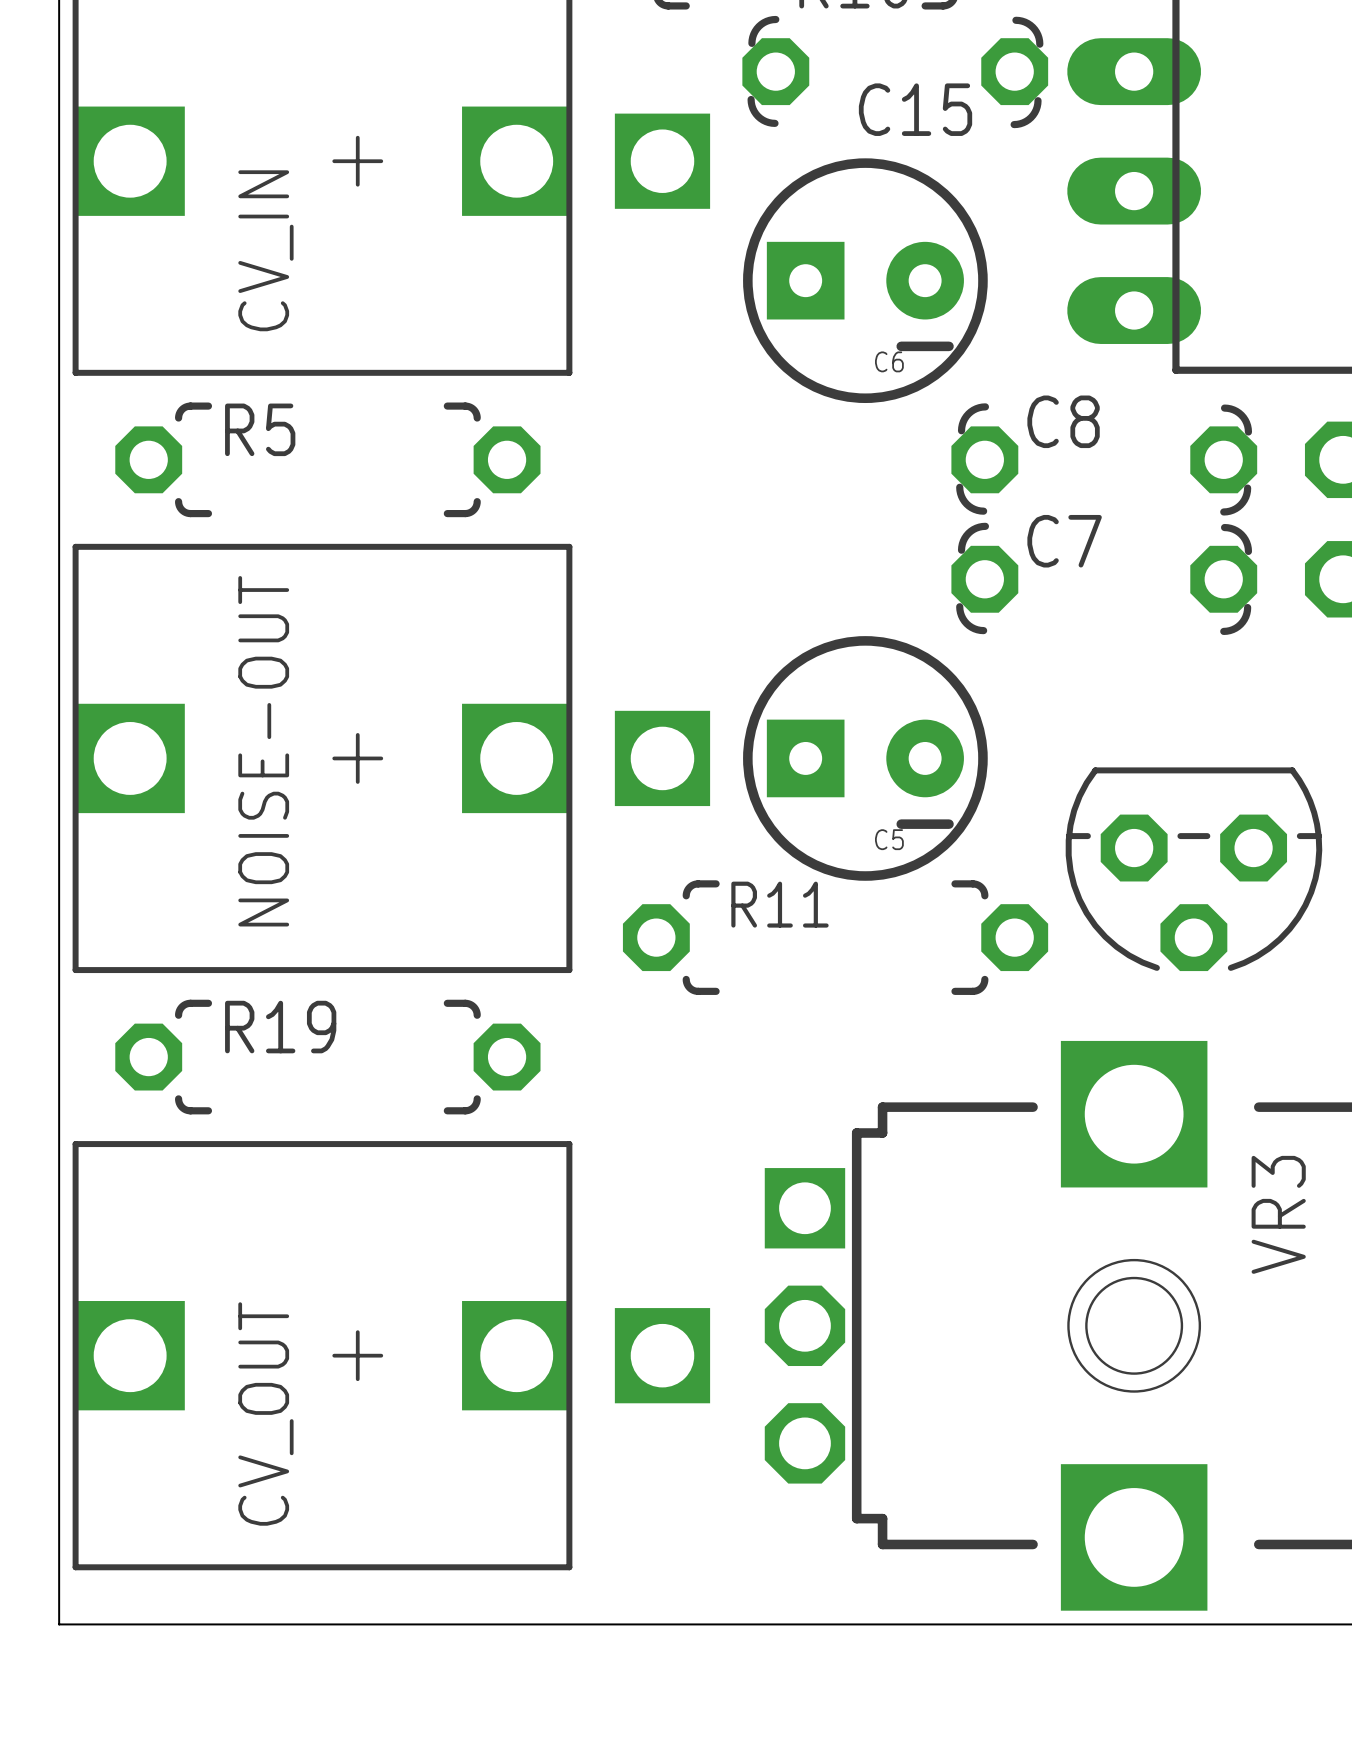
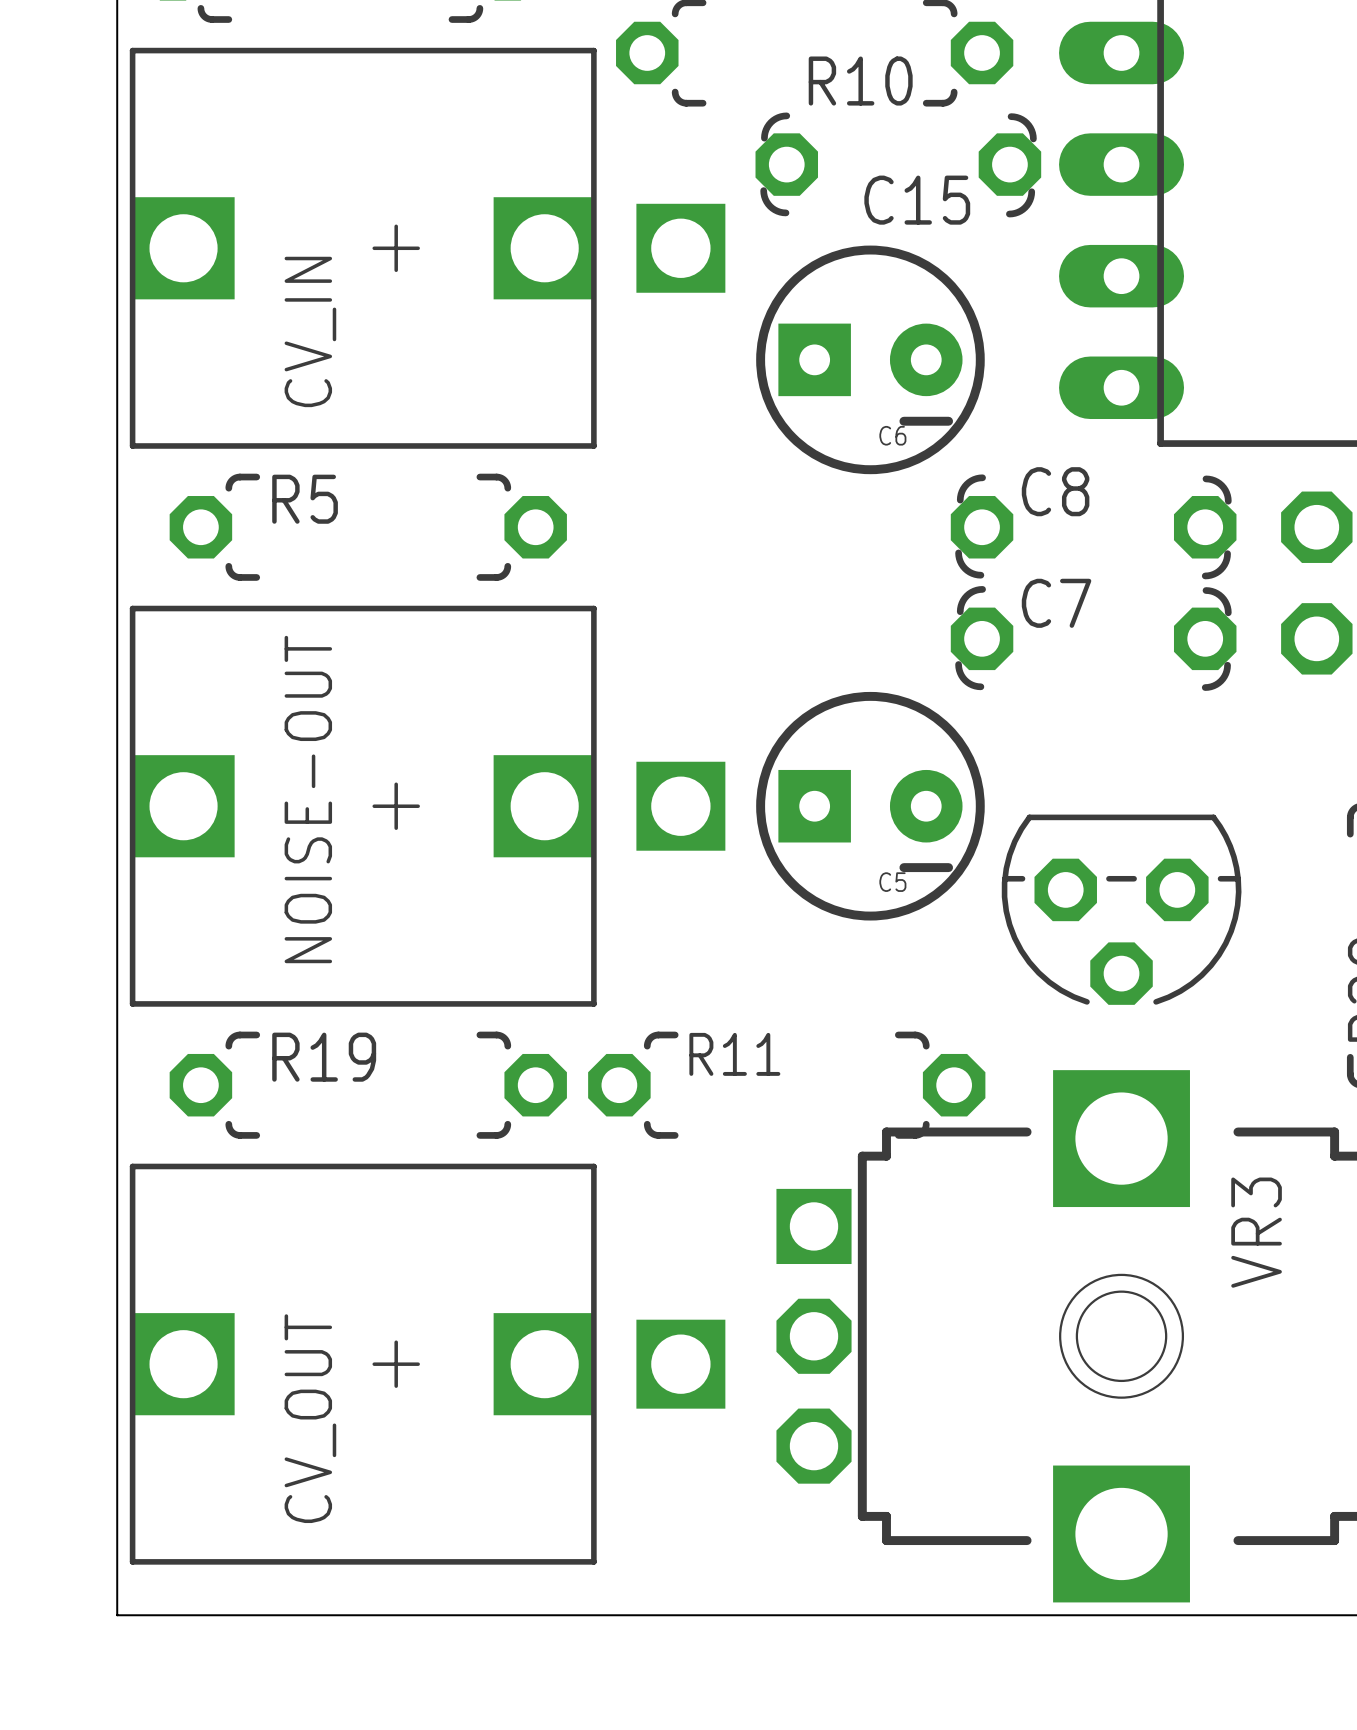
part position: (1193, 869) -> (1121, 909)
R11 position: (835, 937) -> (786, 1085)

